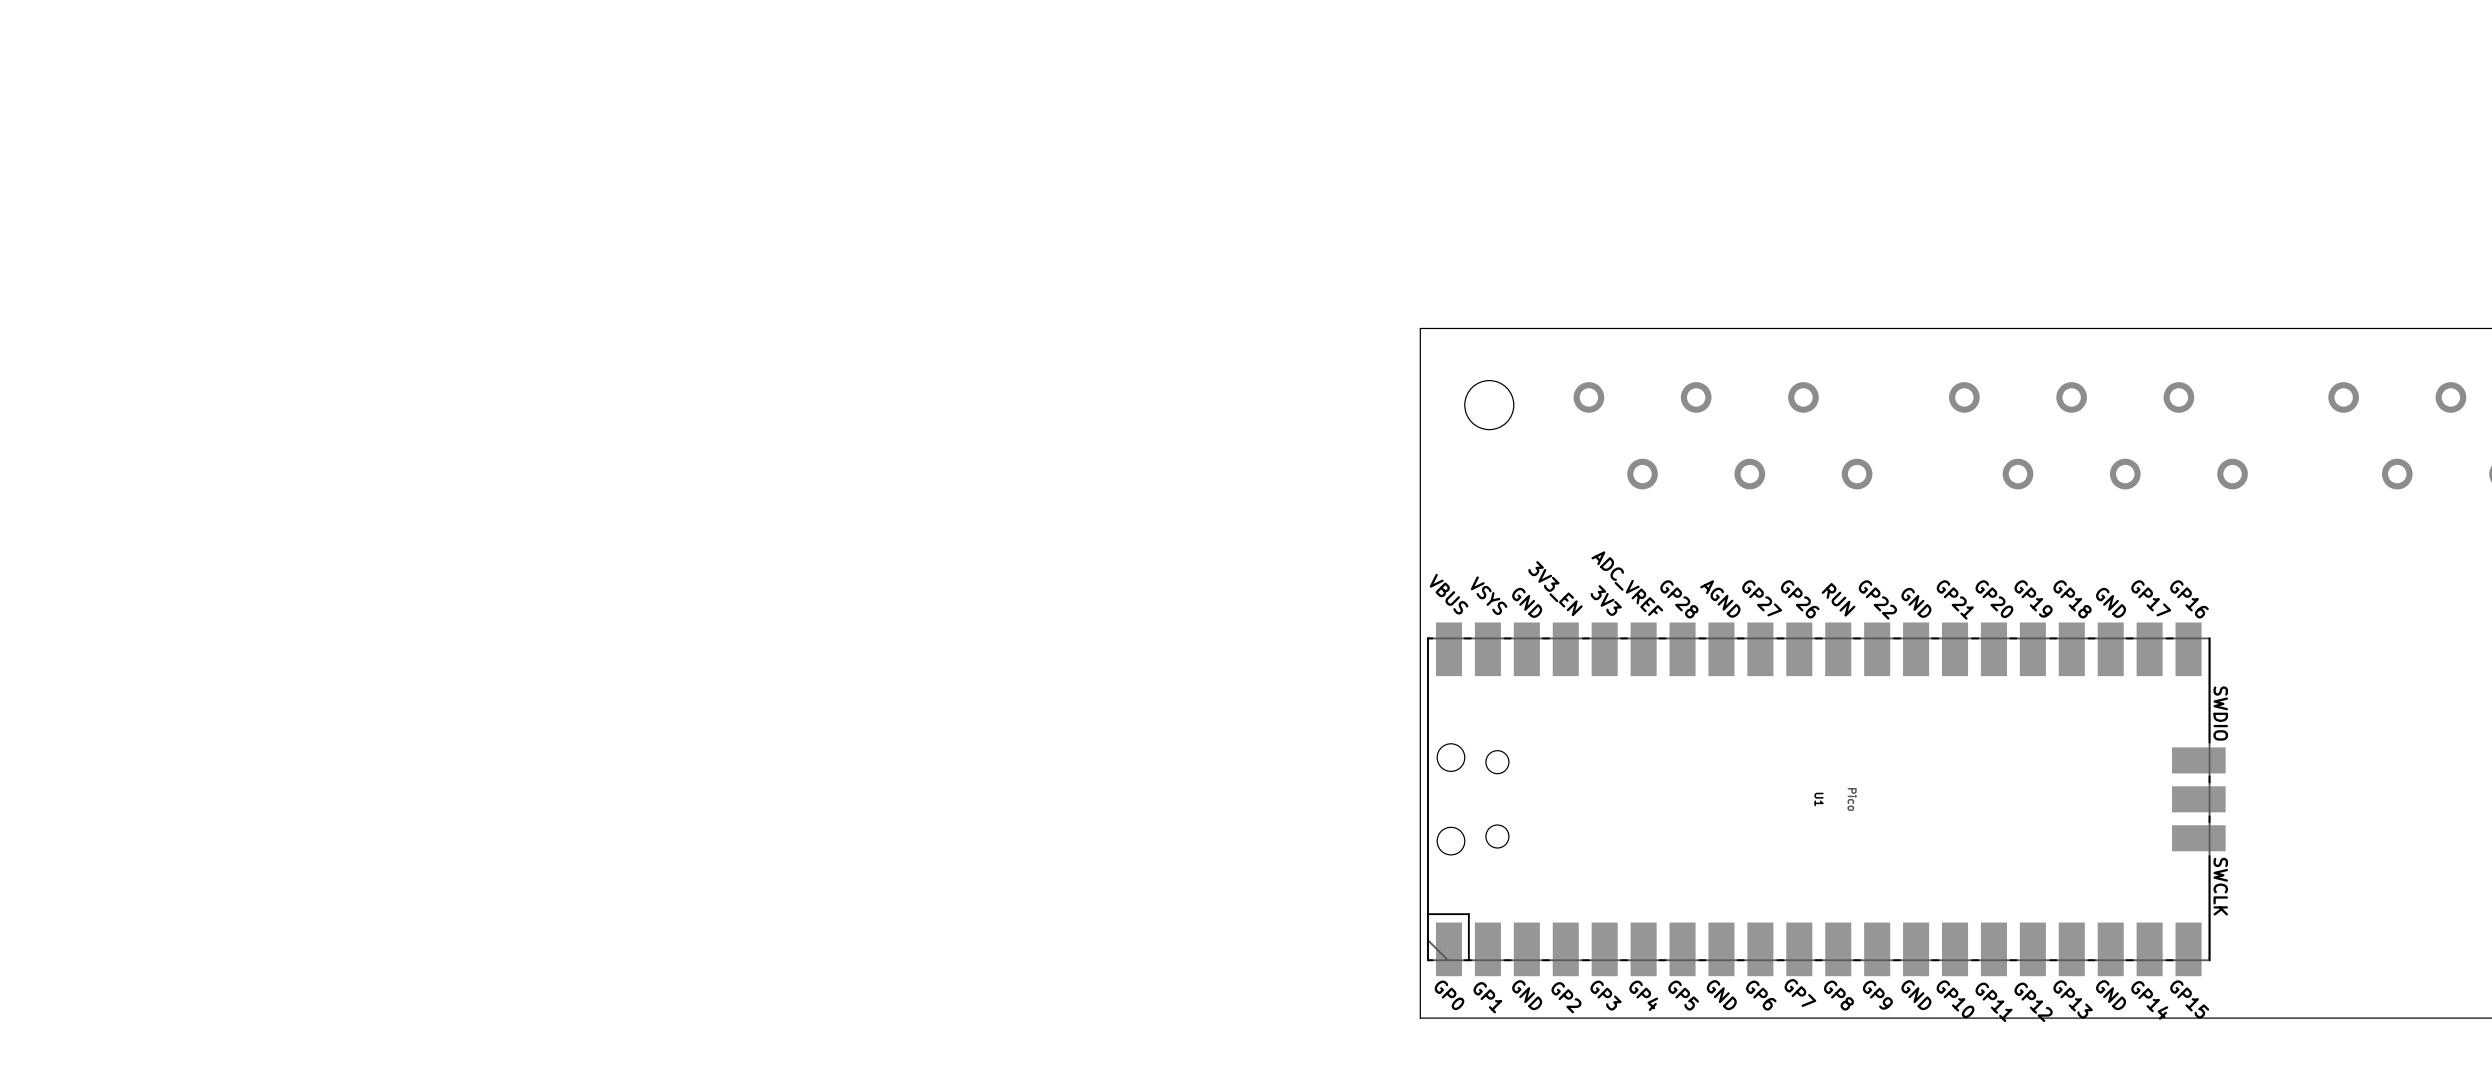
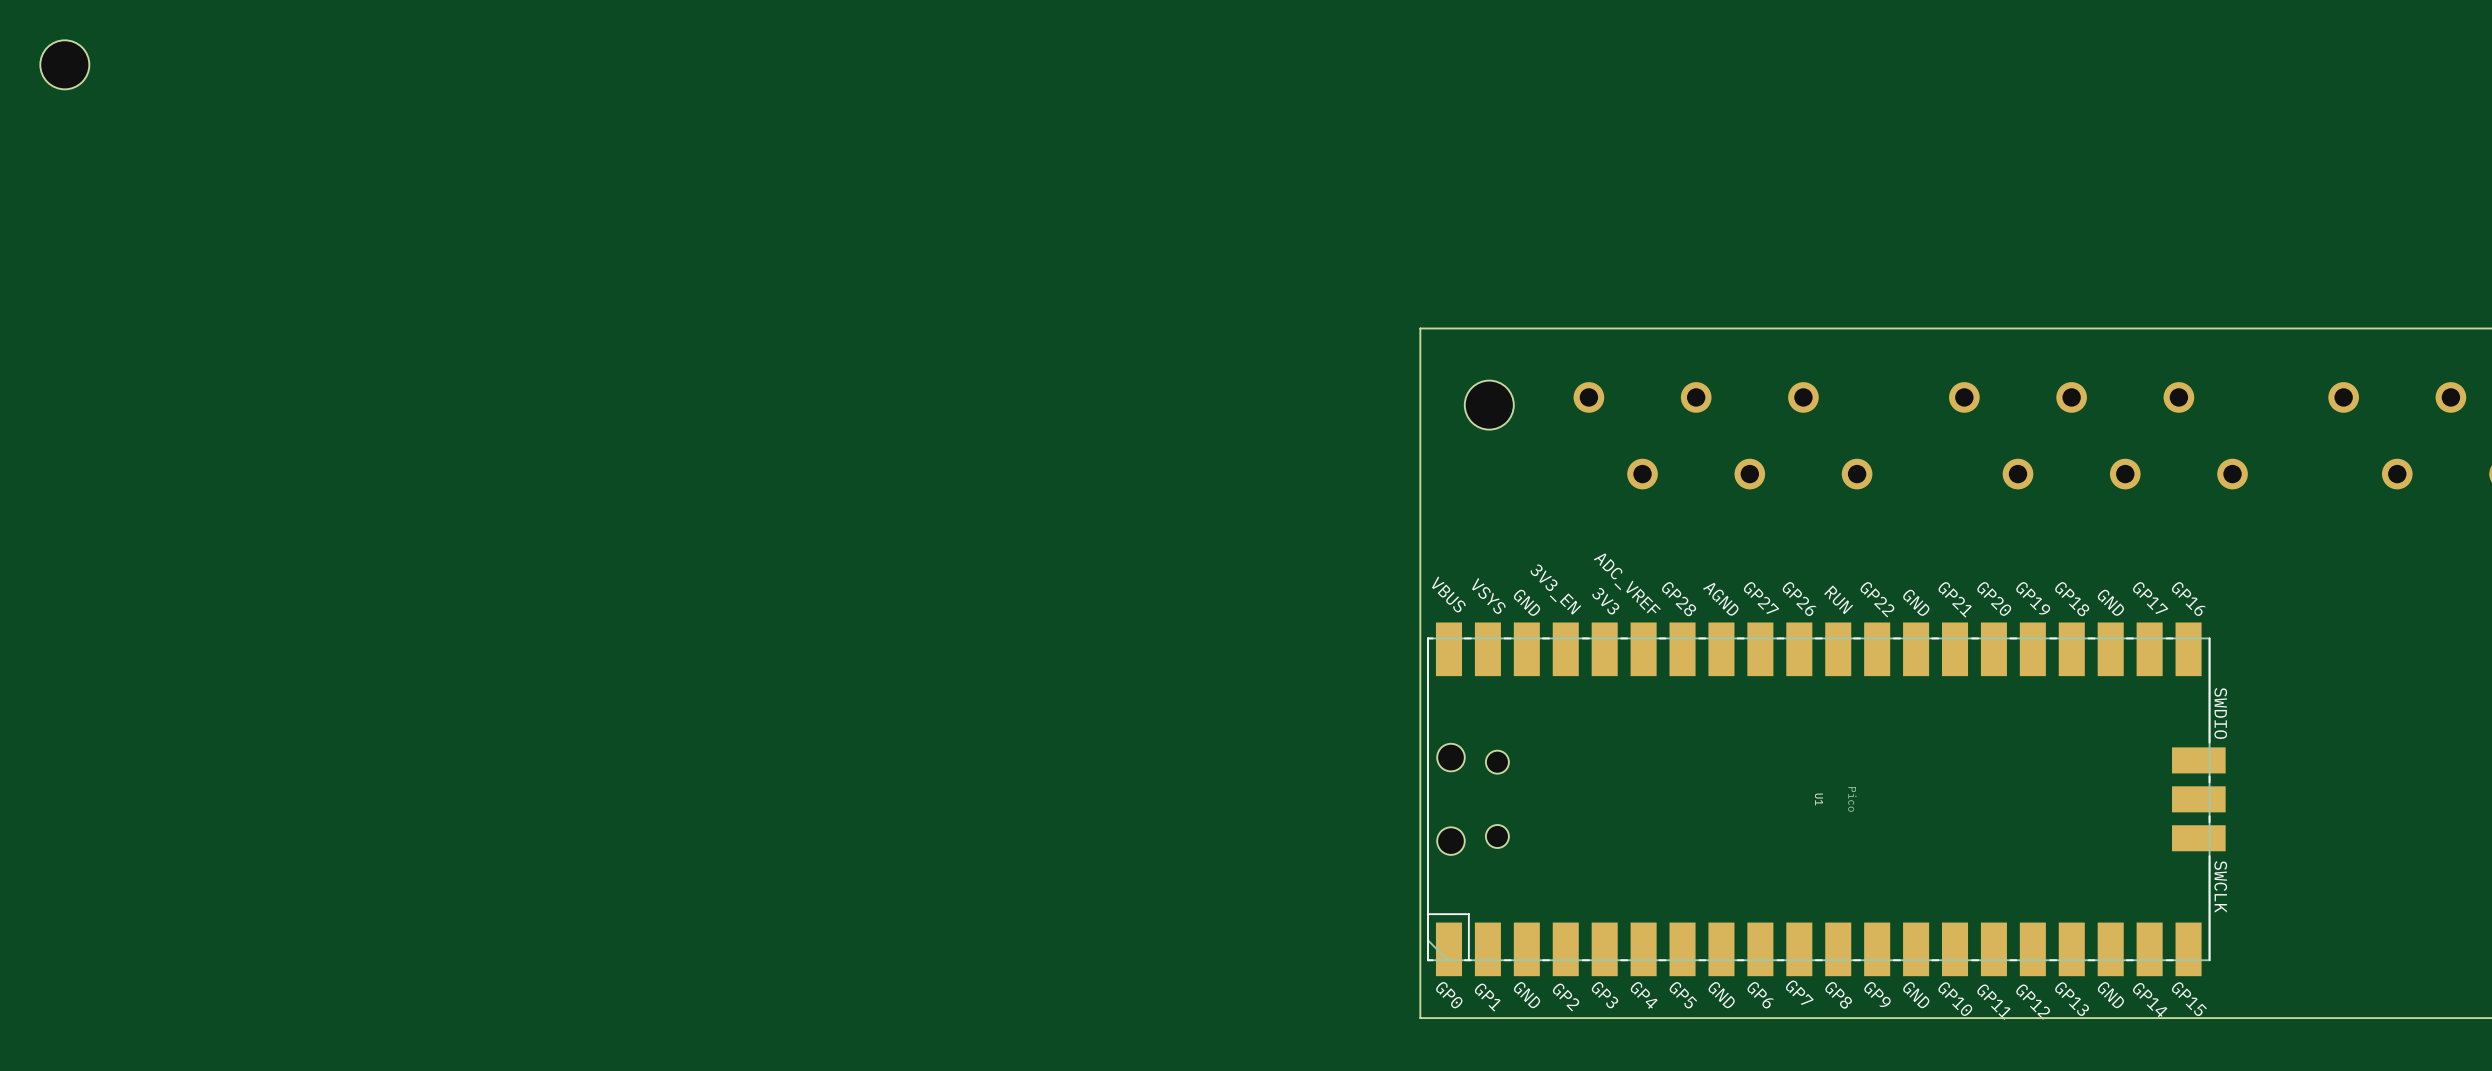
part: none -> (64, 64)

